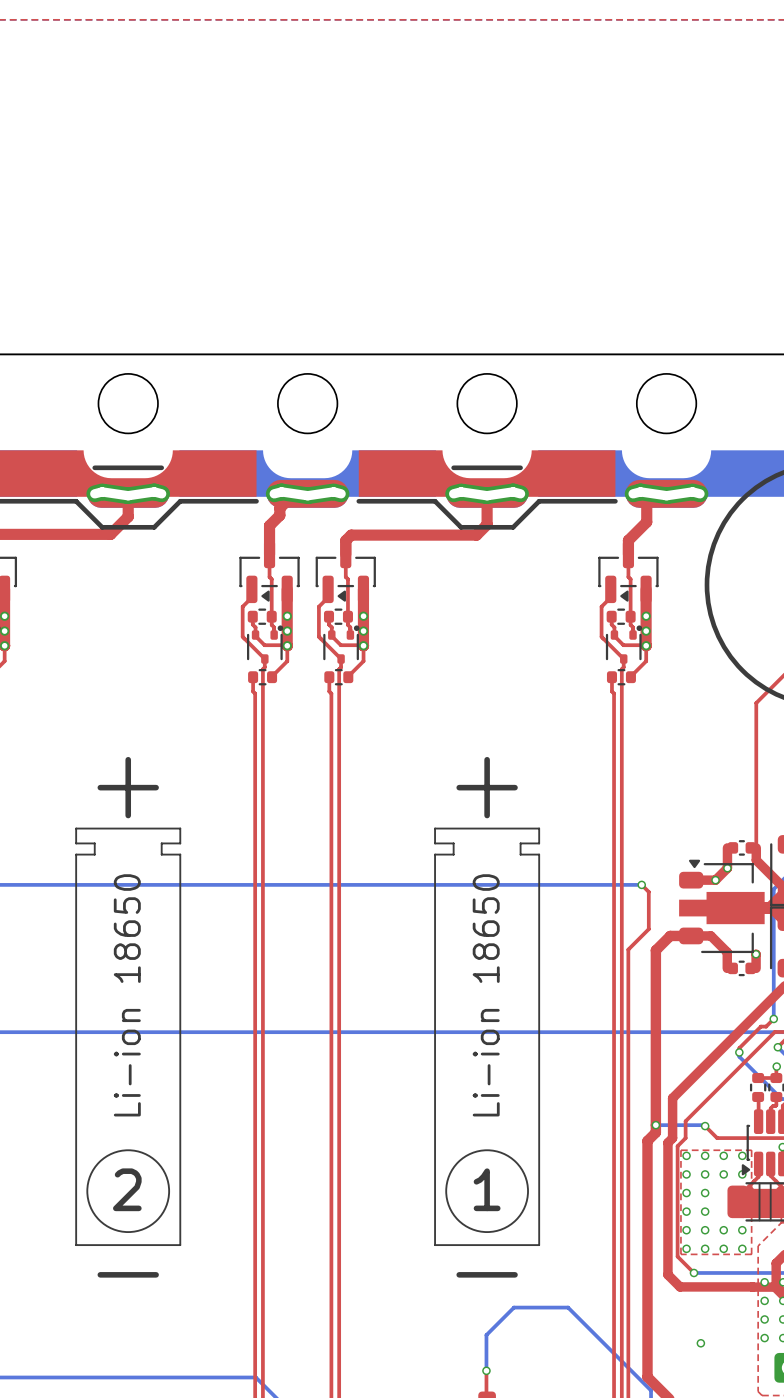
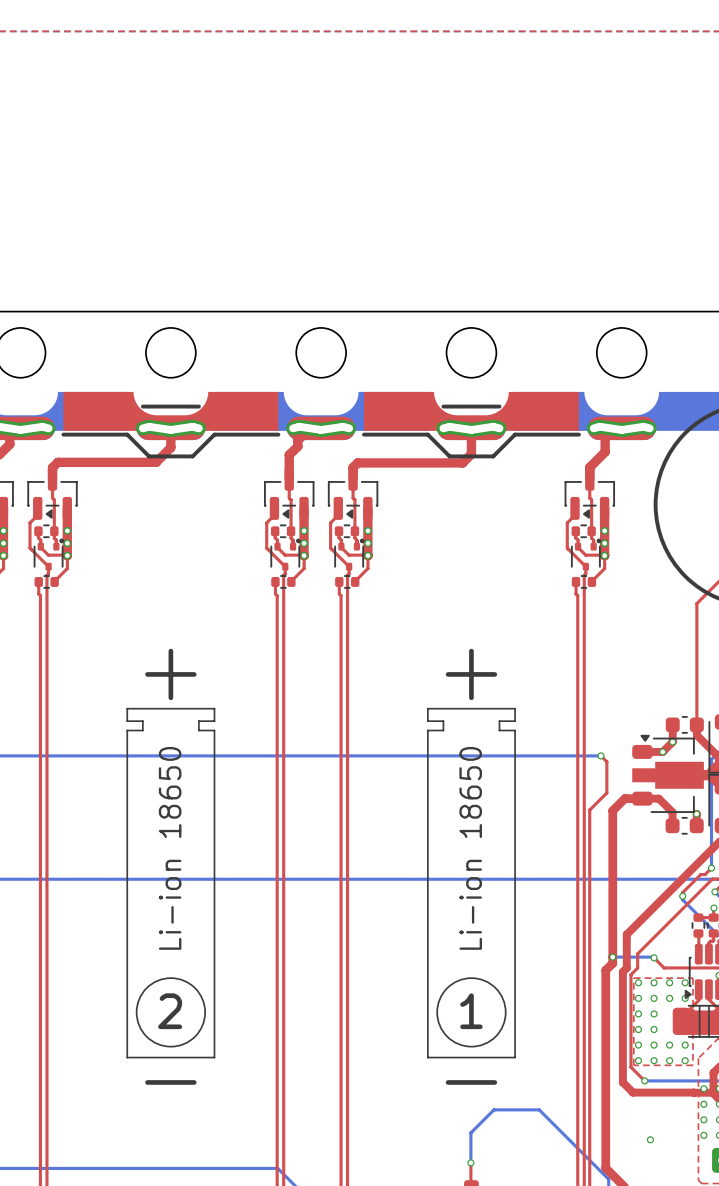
part footprint: [727, 840, 757, 856] -> [665, 716, 704, 734]
part footprint: [727, 960, 756, 977] -> [665, 816, 704, 835]

